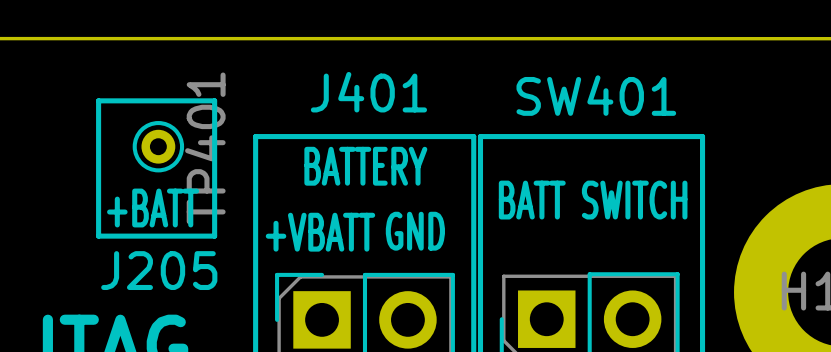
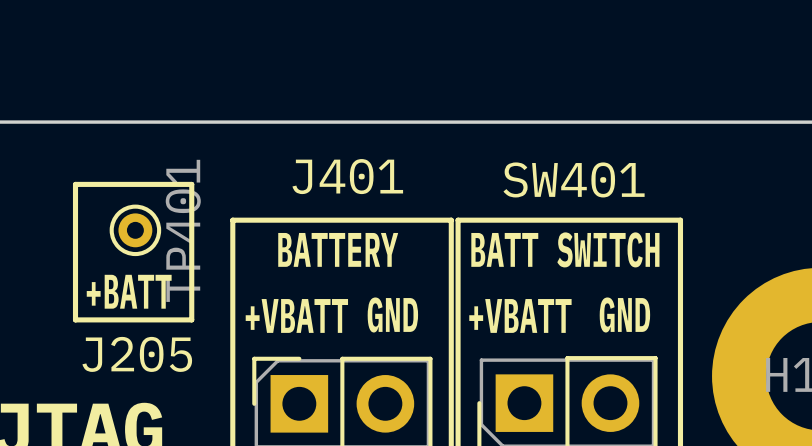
text position: BATT SWITCH (593, 200) -> BATT SWITCH (565, 249)
text: none -> GND (624, 314)
text: none -> +VBATT (520, 315)

